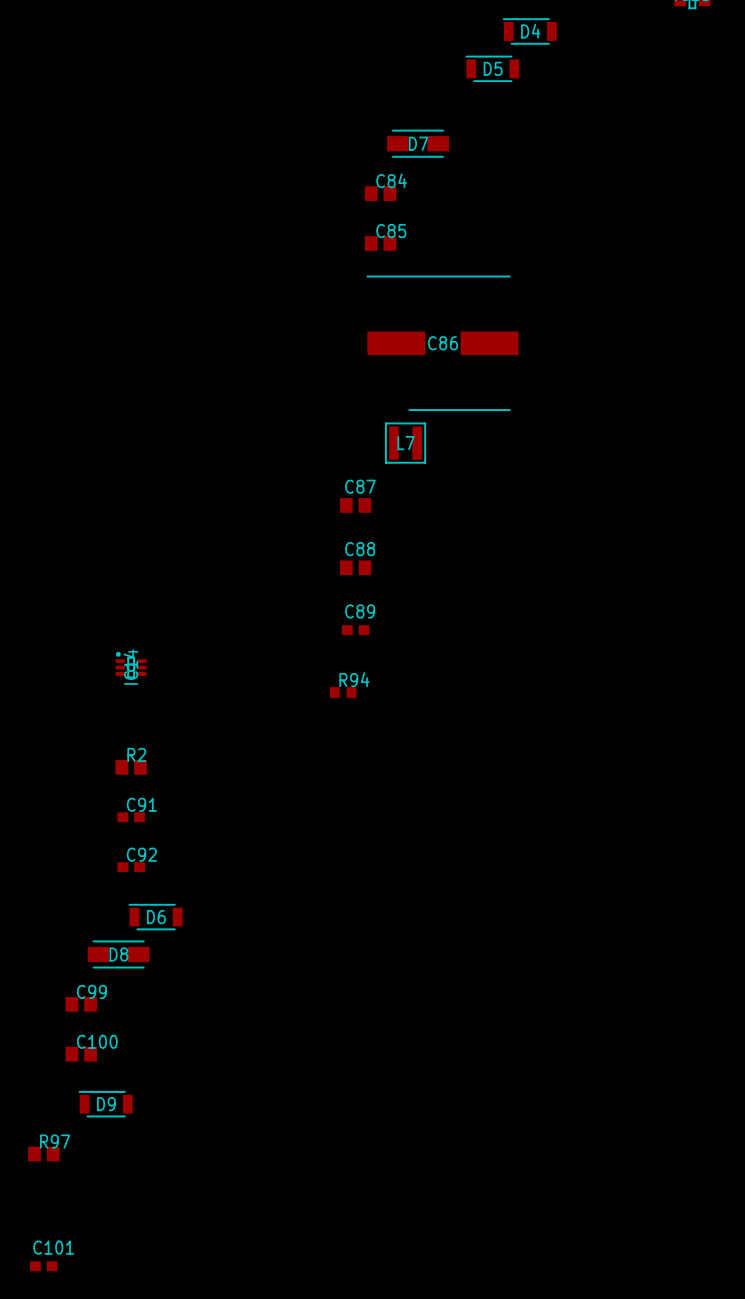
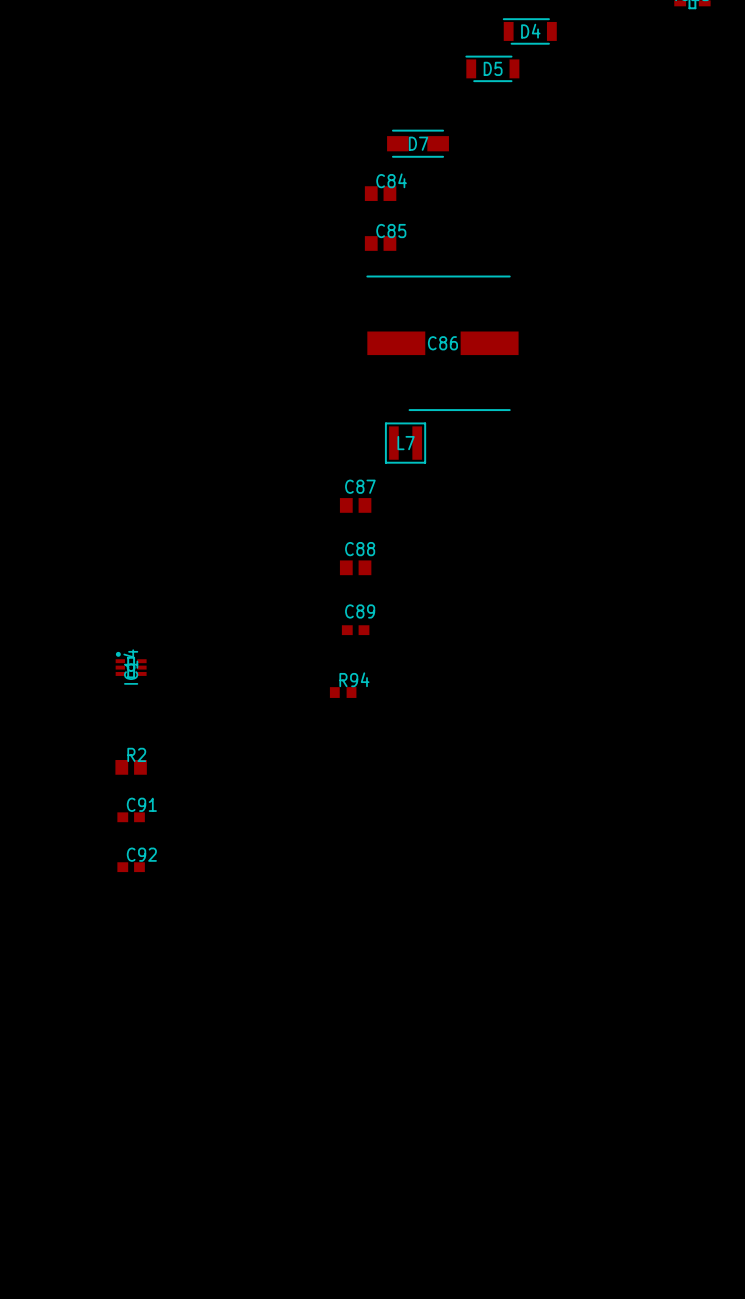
D6: (155, 917) -> none
D8: (118, 954) -> none
C99: (81, 1004) -> none
C100: (81, 1054) -> none
D9: (105, 1104) -> none
R97: (43, 1154) -> none
C101: (43, 1266) -> none

